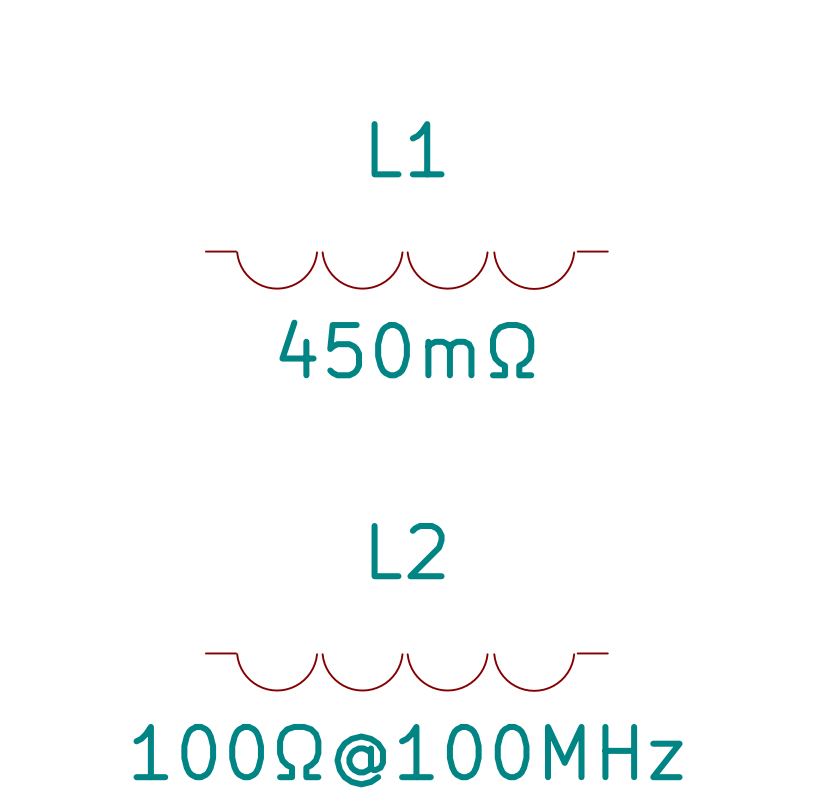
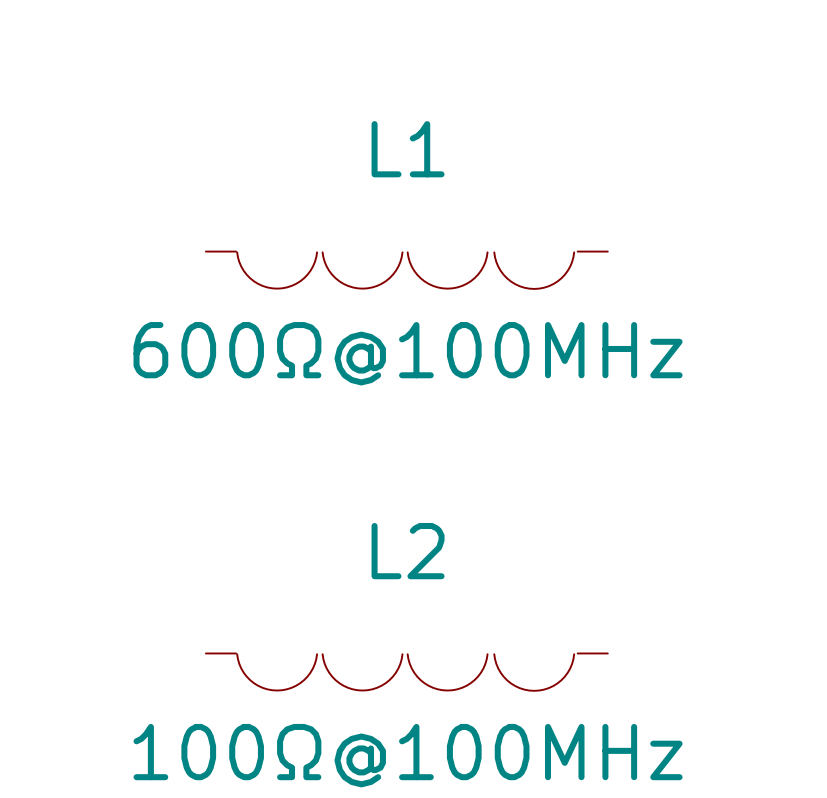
L1 value: 450mΩ (406, 348) -> 600Ω@100MHz (408, 353)

